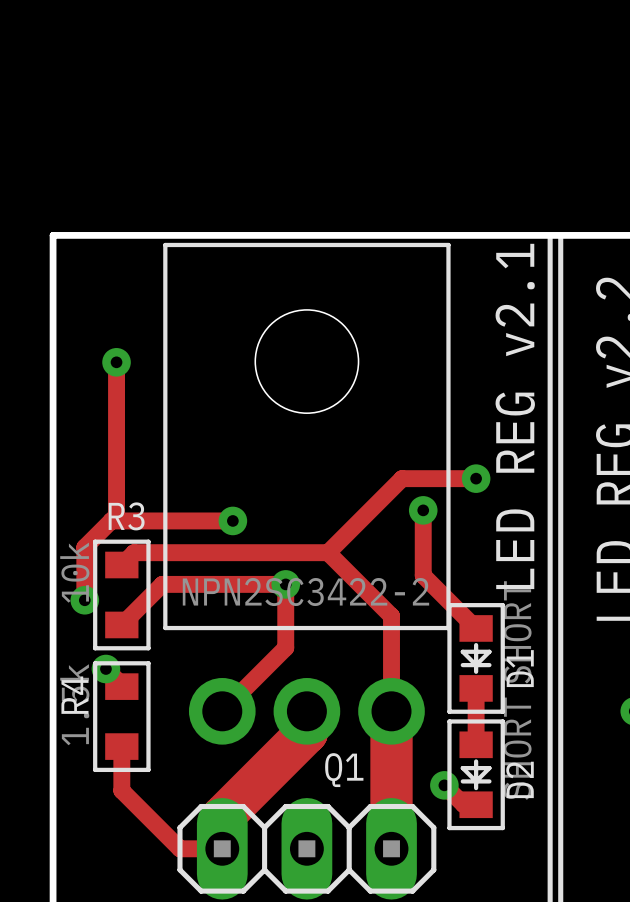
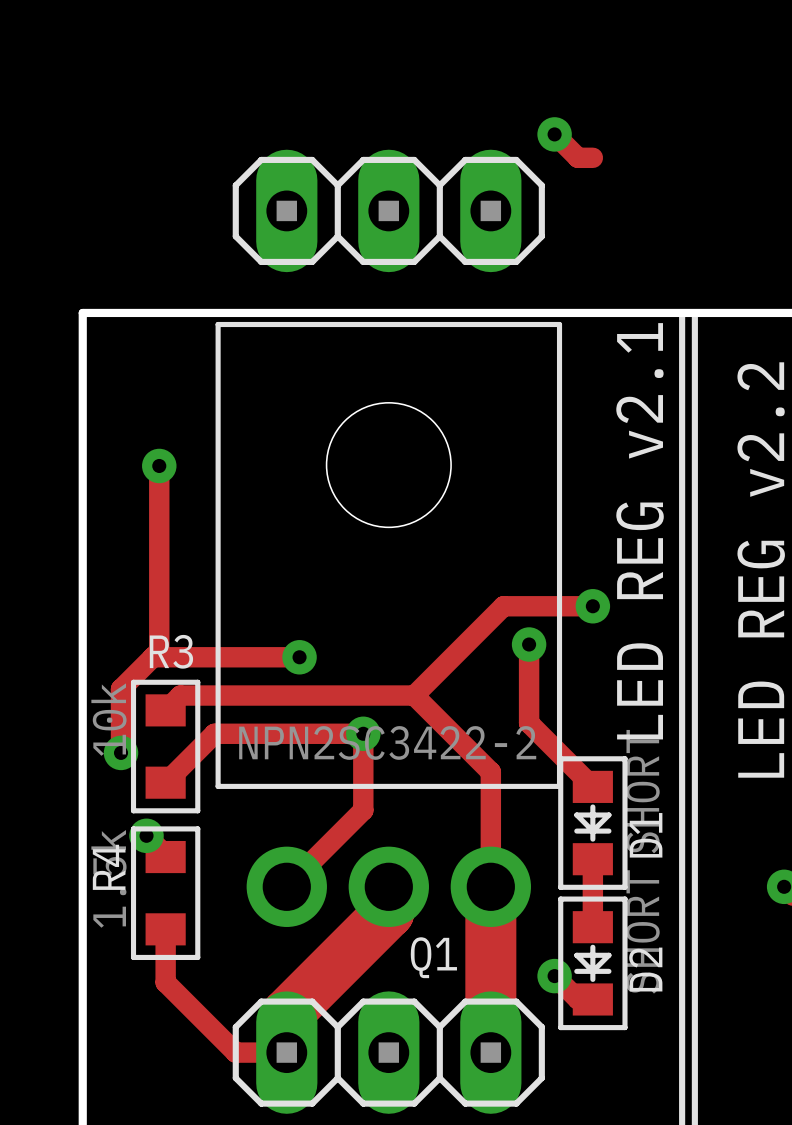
track: none -> (554, 134) (577, 157) (592, 157)
via: none -> (554, 134)
part: none -> (388, 210)

